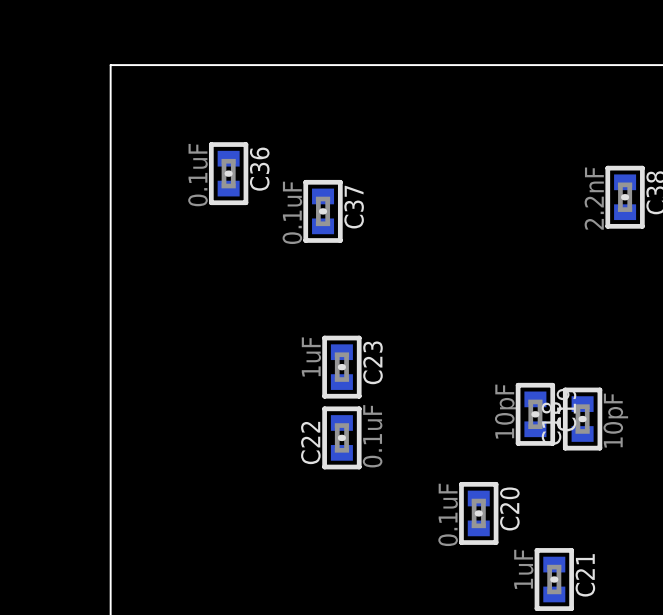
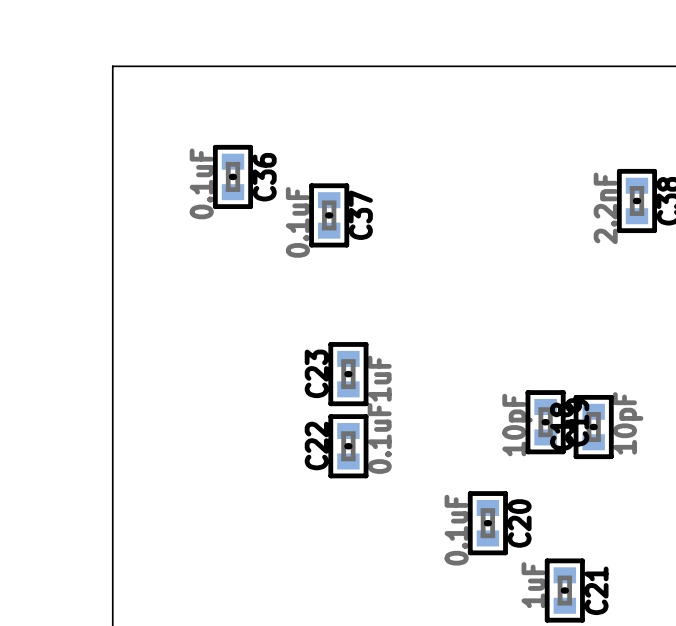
C23 value position: 1uF (311, 356) -> 1uF (379, 378)
C23 name position: C23 (372, 362) -> C23 (316, 373)

